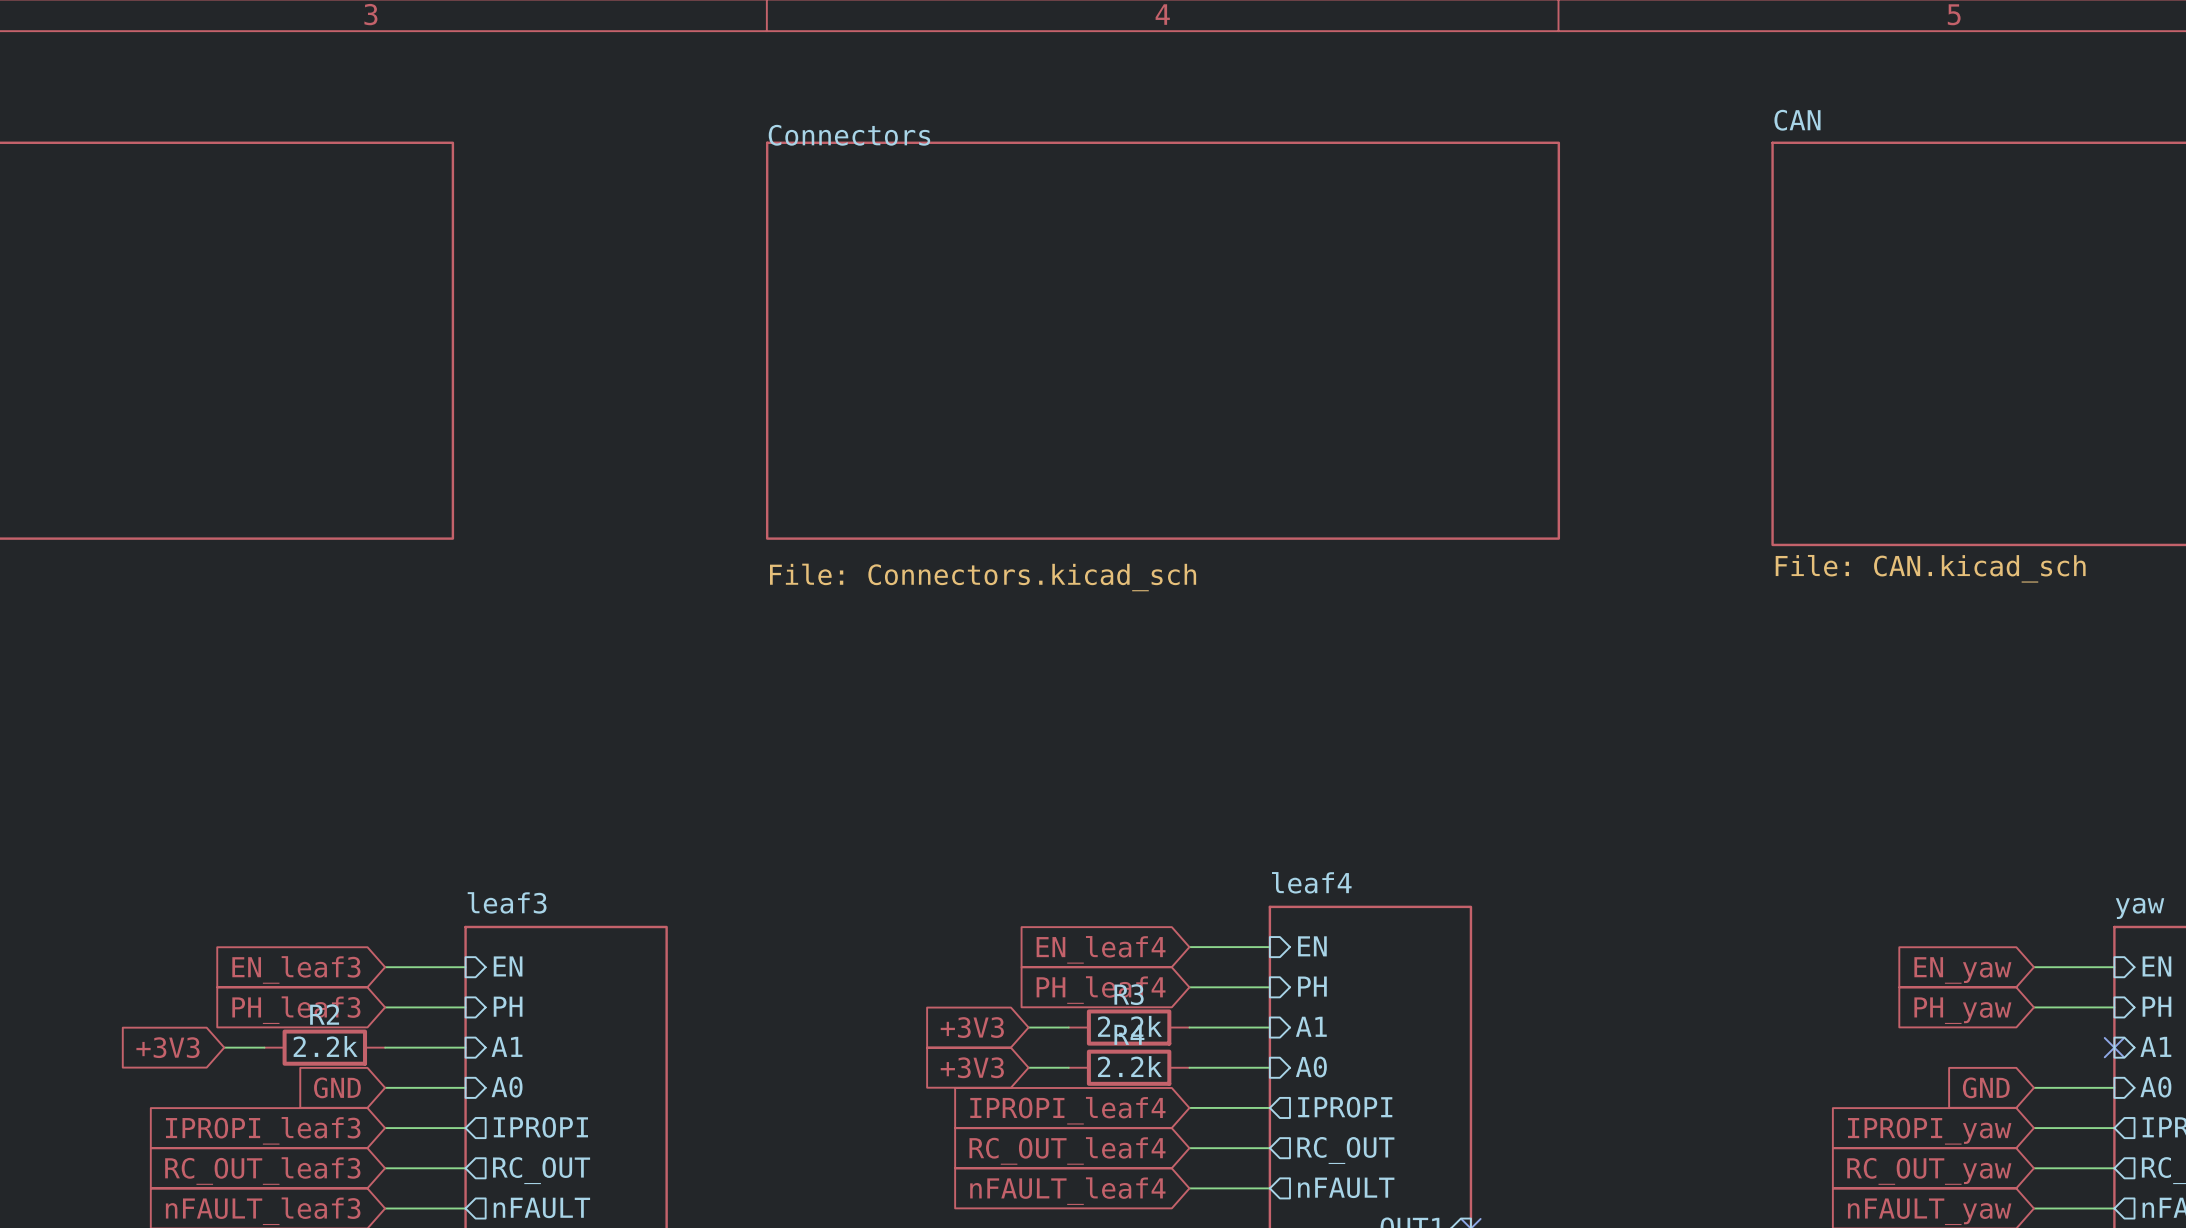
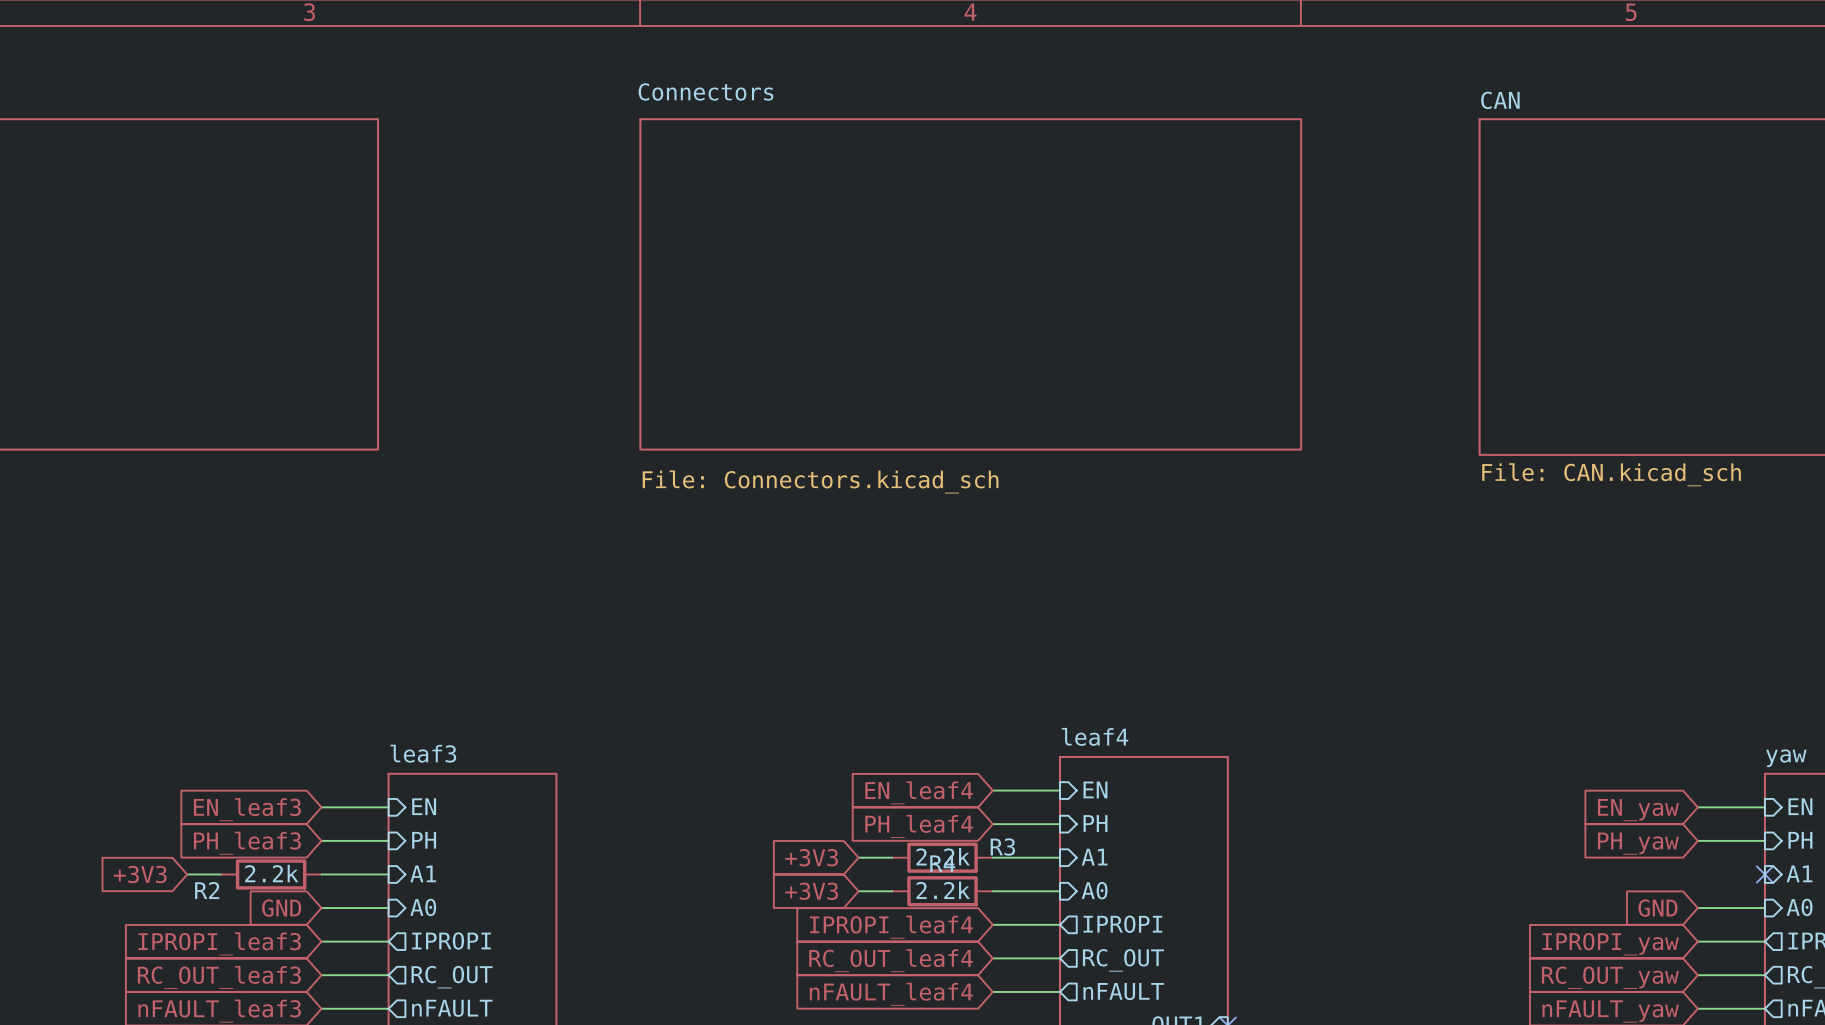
sheet Connectors name position: Connectors (849, 135) -> Connectors (705, 91)
R3 name position: R3 (1129, 994) -> R3 (1002, 847)
R2 name position: R2 (324, 1014) -> R2 (207, 890)

